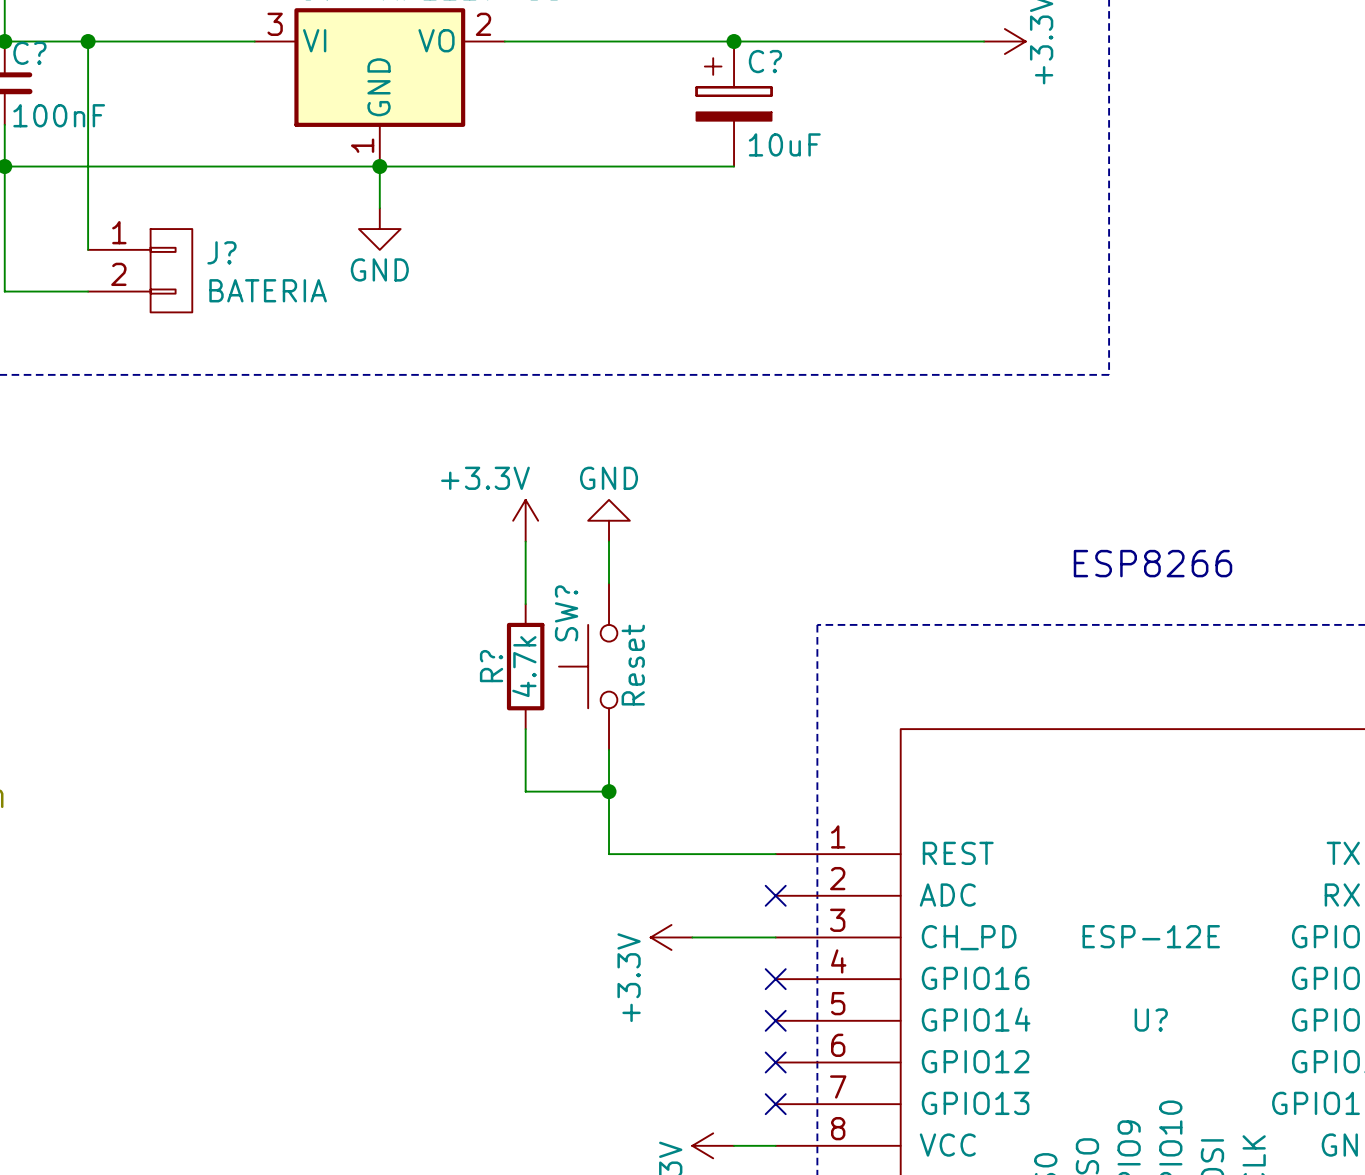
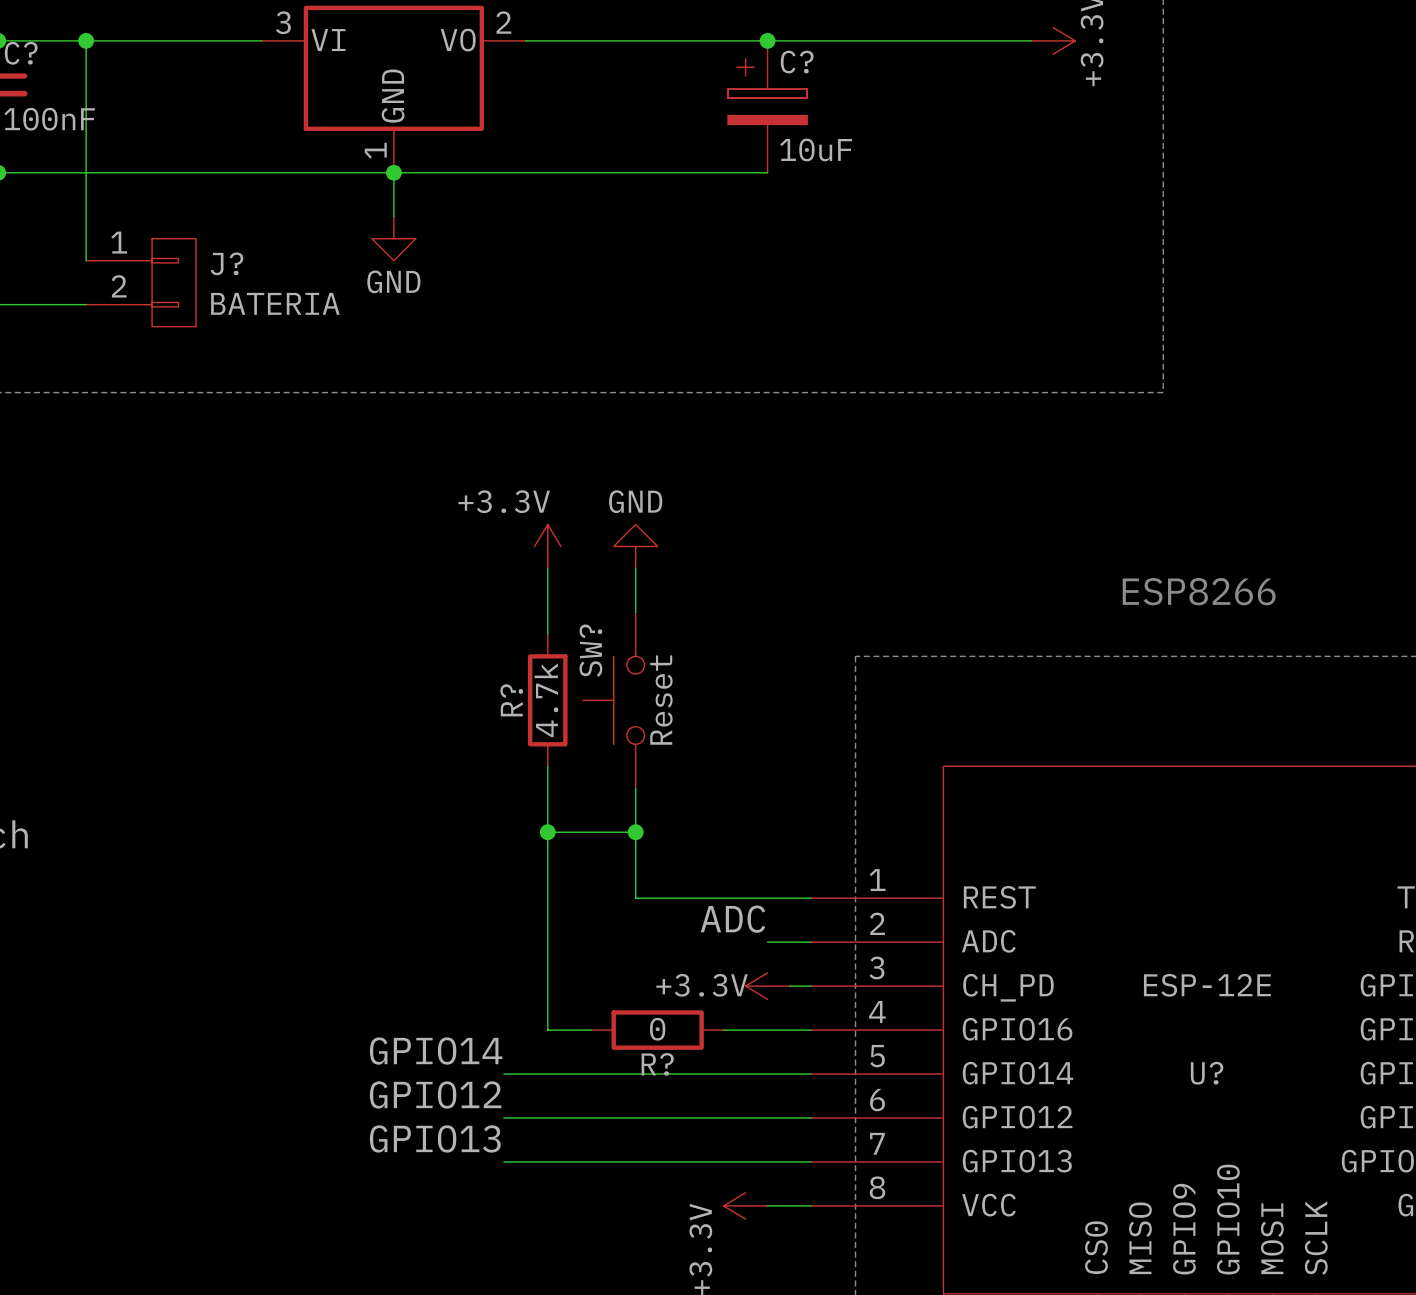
wire: none -> (547, 832) (547, 1030) (591, 1030)
junction: none -> (547, 832)
label: none -> ADC (732, 919)
wire: none -> (767, 942) (811, 942)
no-connect mark: (775, 895) -> none
power symbol position: +3.3V (671, 937) -> +3.3V (767, 986)
power symbol text rotation: 0° (629, 977) -> 90° clockwise (702, 985)
R?: none -> 0 (657, 1030)
wire: none -> (723, 1030) (811, 1030)
no-connect mark: (775, 979) -> none
label: none -> GPIO14 (436, 1051)
wire: none -> (503, 1074) (811, 1074)
no-connect mark: (775, 1020) -> none
label: none -> GPIO12 (435, 1094)
wire: none -> (503, 1118) (811, 1118)
no-connect mark: (775, 1062) -> none
label: none -> GPIO13 (435, 1138)
wire: none -> (503, 1161) (811, 1161)
no-connect mark: (775, 1104) -> none

